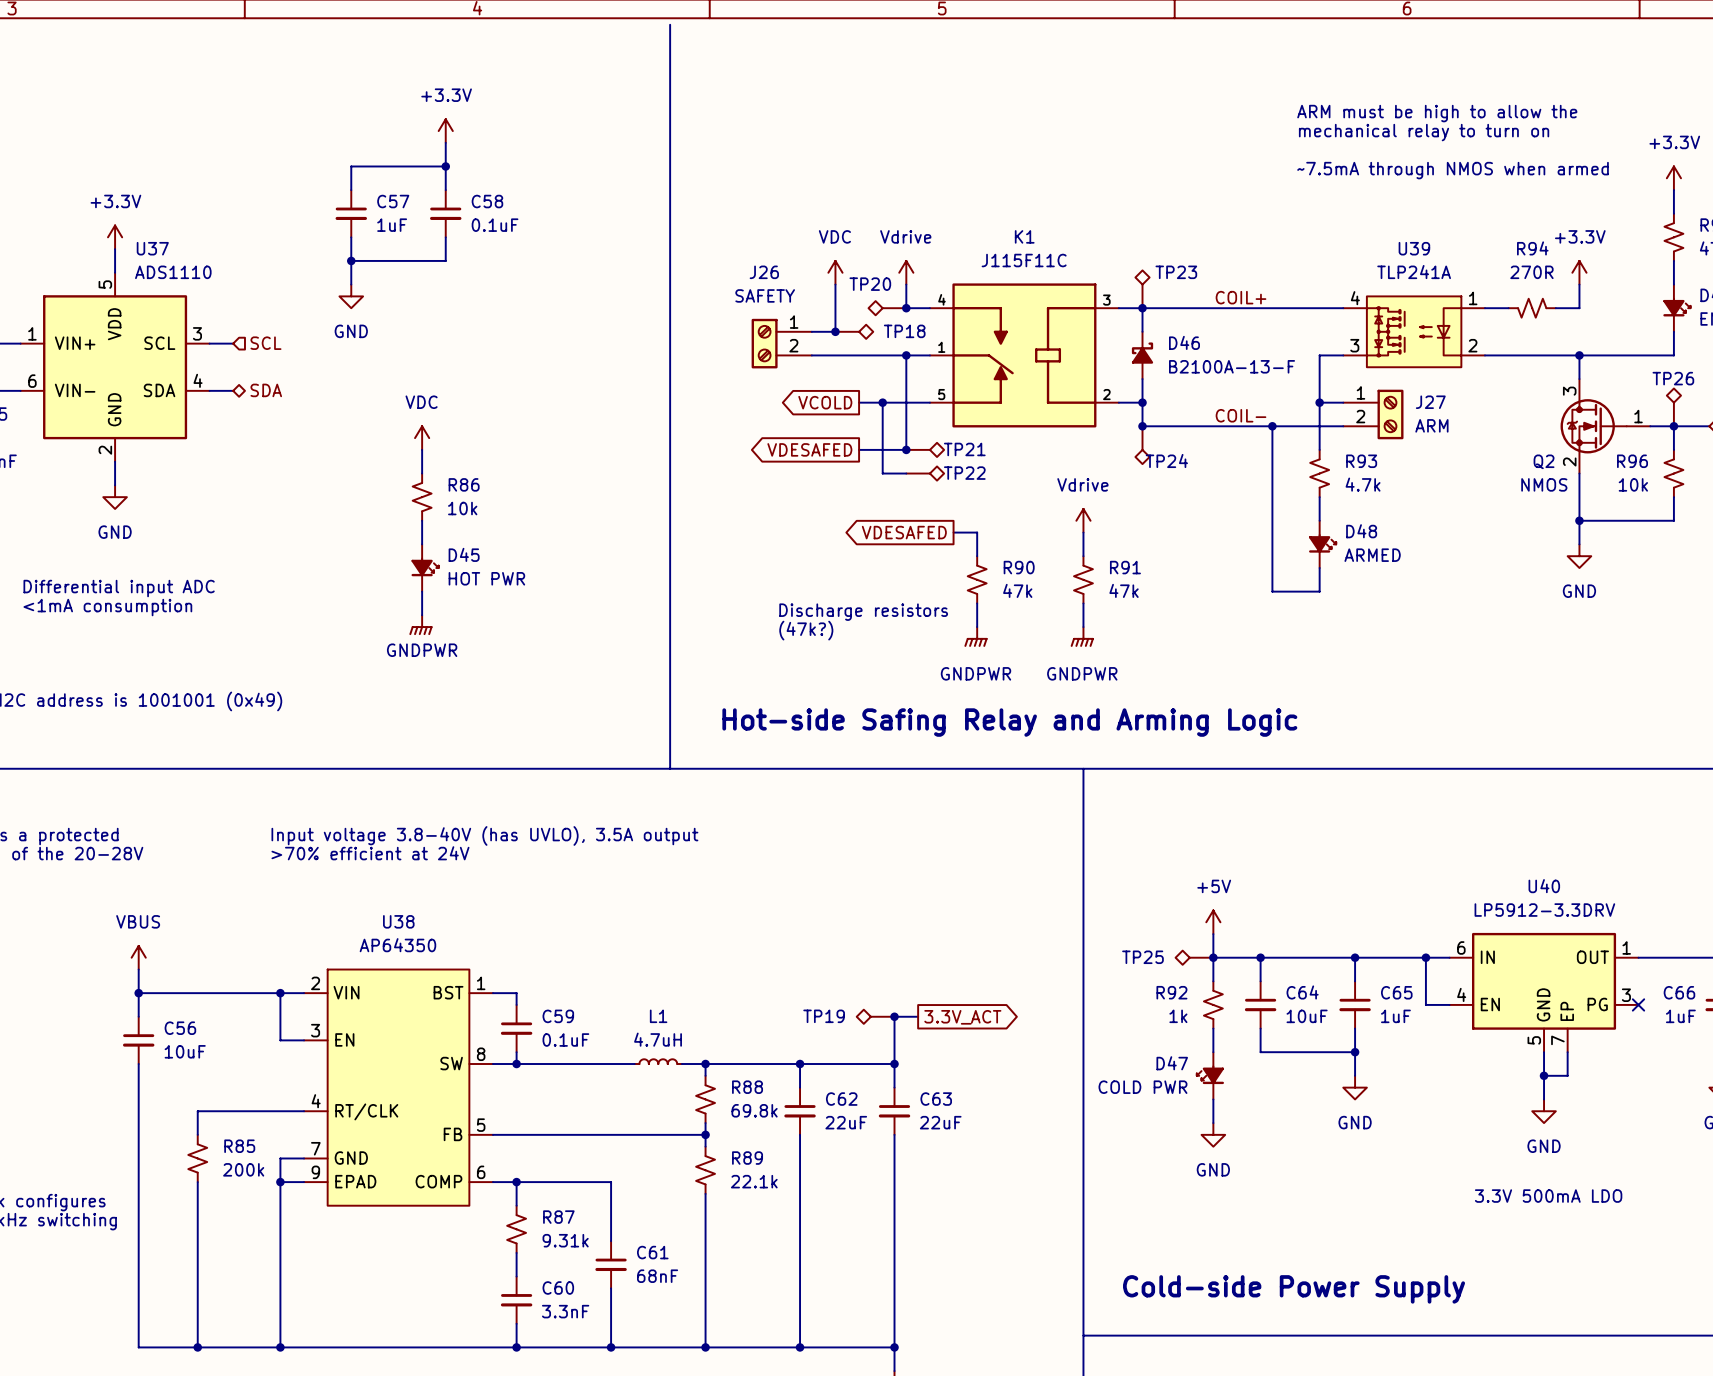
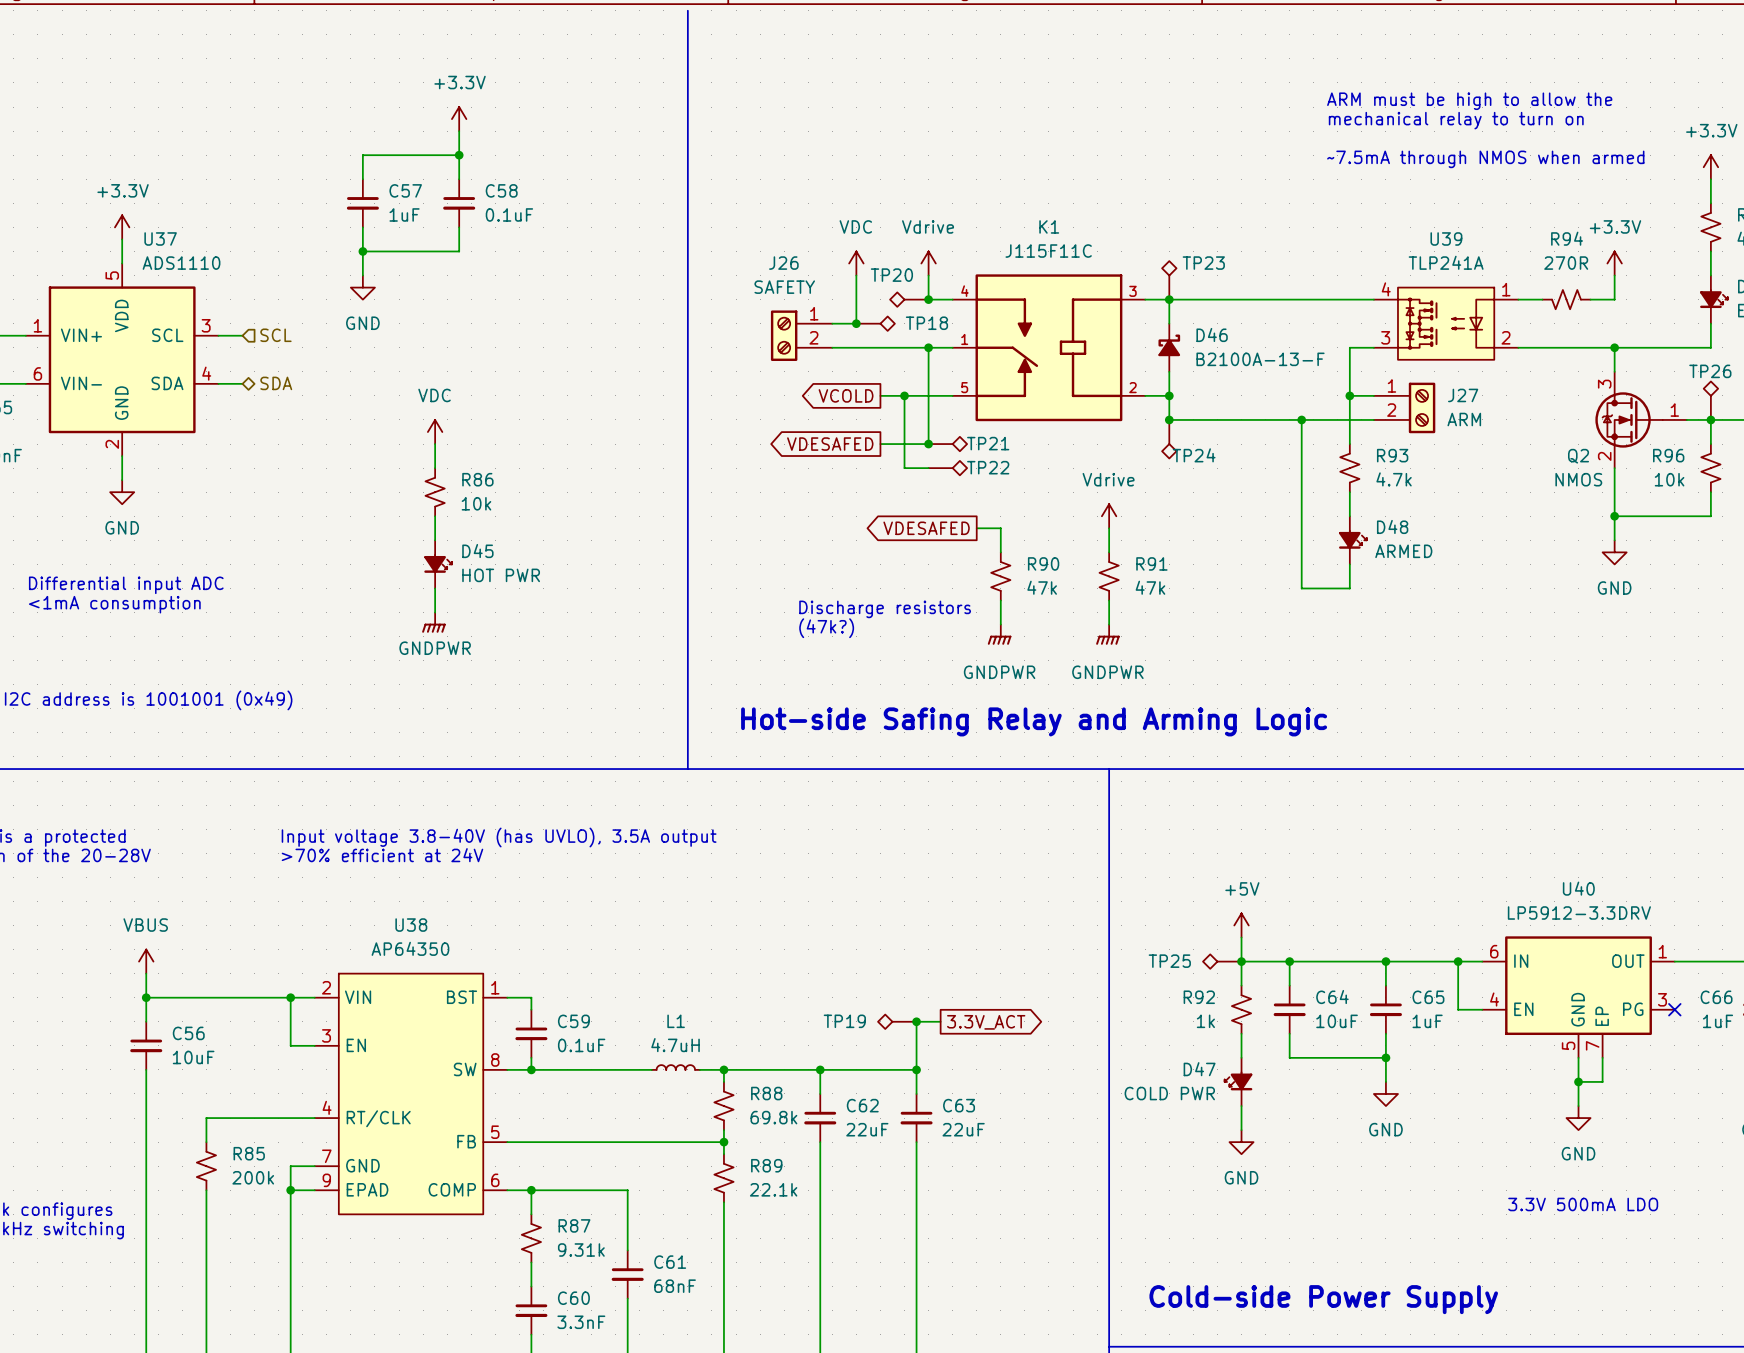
label: COIL+ (1241, 297) -> none
label: COIL- (1241, 415) -> none

